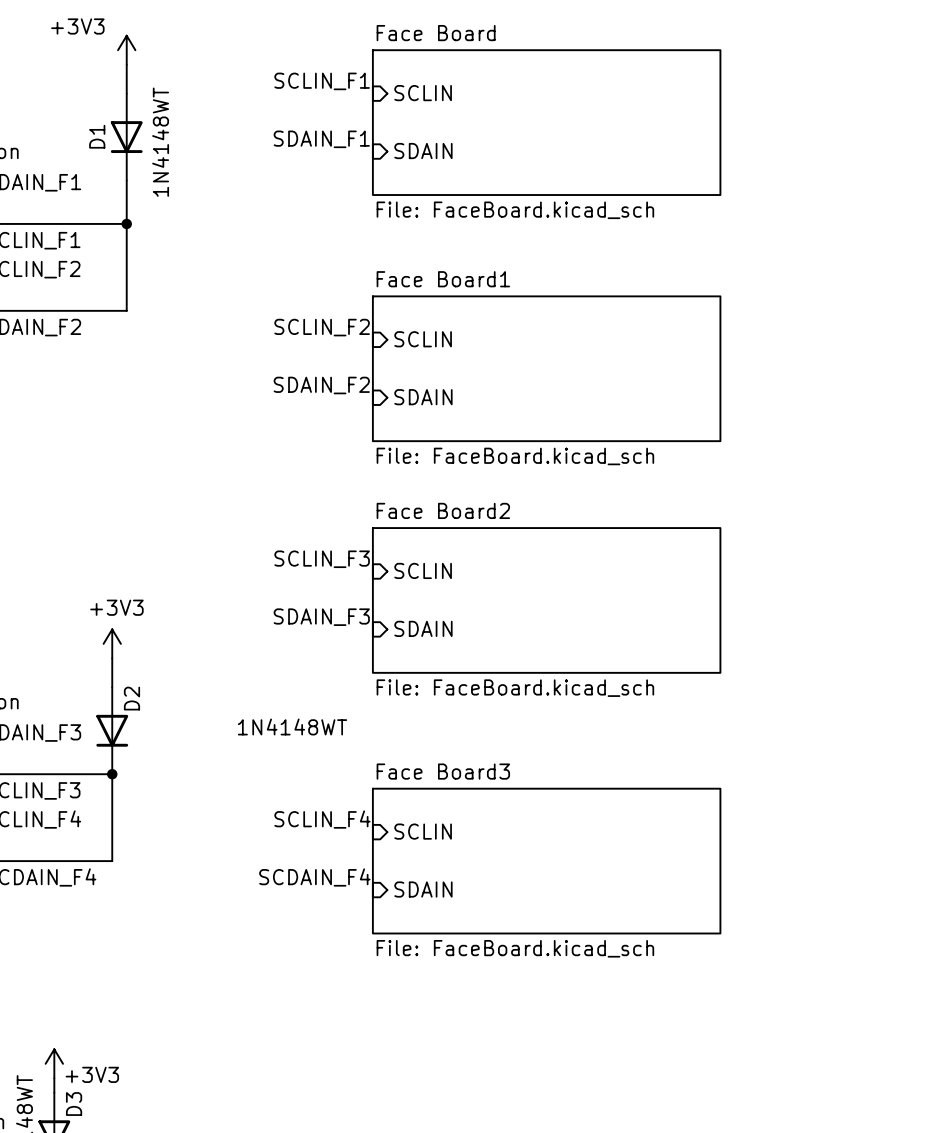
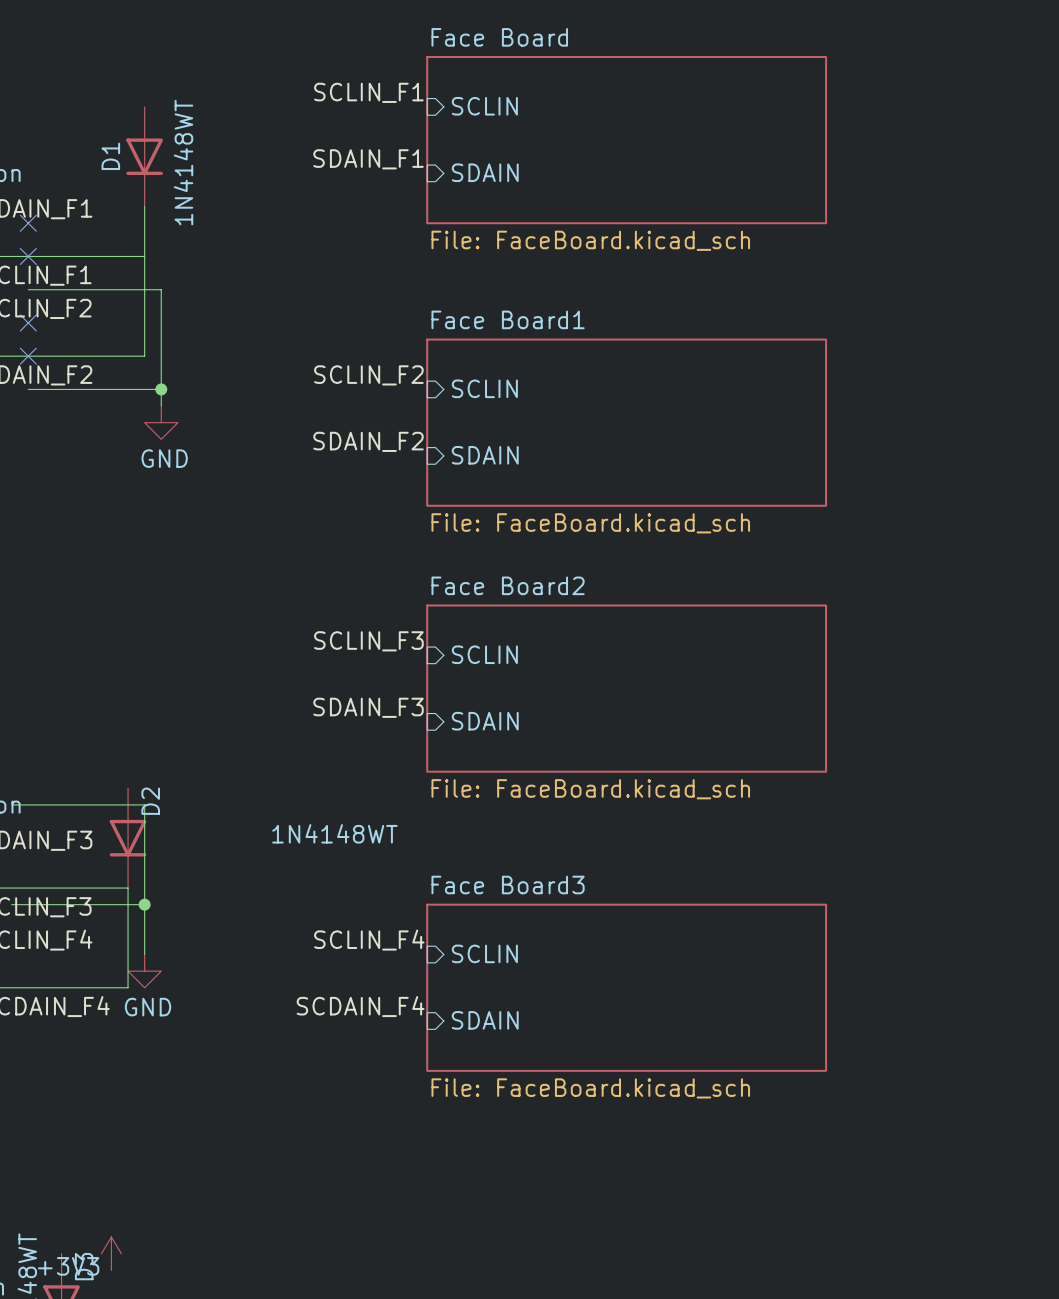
power symbol: +3V3 (126, 50) -> none
wire: (126, 64) (126, 93) -> none
no-connect mark: none -> (28, 223)
no-connect mark: none -> (28, 256)
junction: (126, 223) -> none
wire: none -> (28, 289) (161, 289) (161, 406)
no-connect mark: none -> (28, 322)
no-connect mark: none -> (28, 356)
wire: none -> (28, 389) (161, 389)
junction: none -> (161, 389)
power symbol: none -> GND (161, 422)
power symbol: +3V3 (112, 643) -> none
wire: (112, 658) (112, 687) -> none
wire: none -> (11, 804) (144, 804) (144, 954)
junction position: (112, 774) -> (144, 904)
wire: none -> (11, 904) (144, 904)
power symbol: none -> GND (144, 971)
power symbol position: +3V3 (54, 1063) -> +3V3 (111, 1253)
power symbol text position: +3V3 (92, 1074) -> +3V3 (68, 1266)
wire: (54, 1078) (54, 1092) -> none

